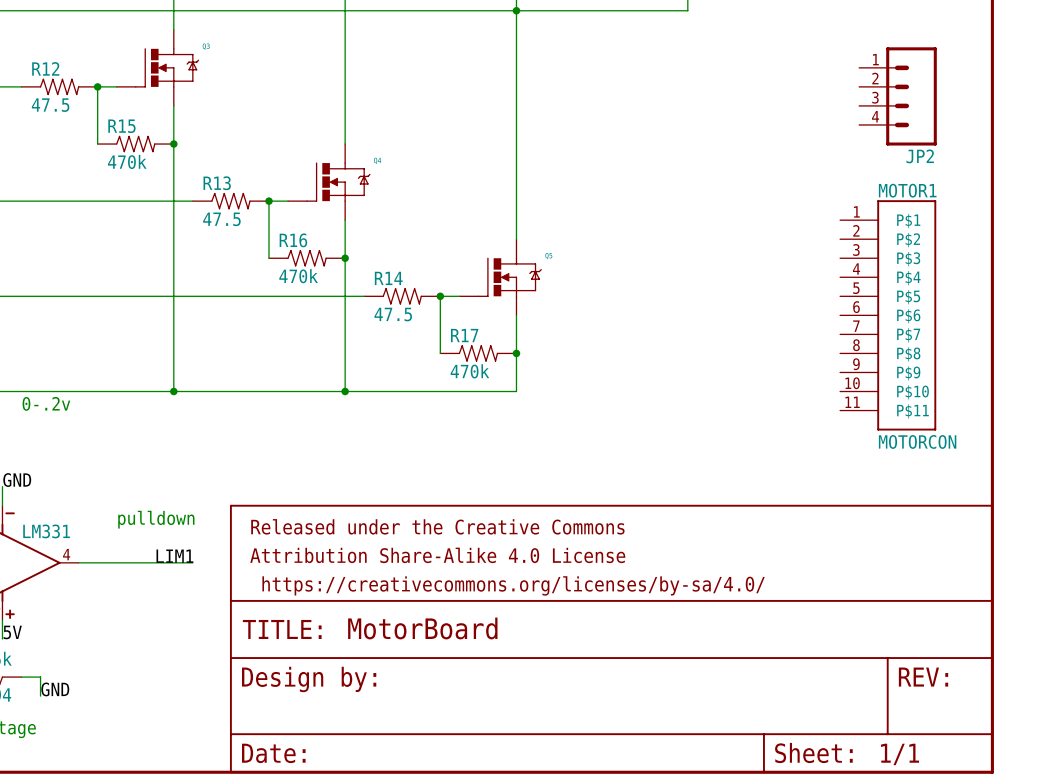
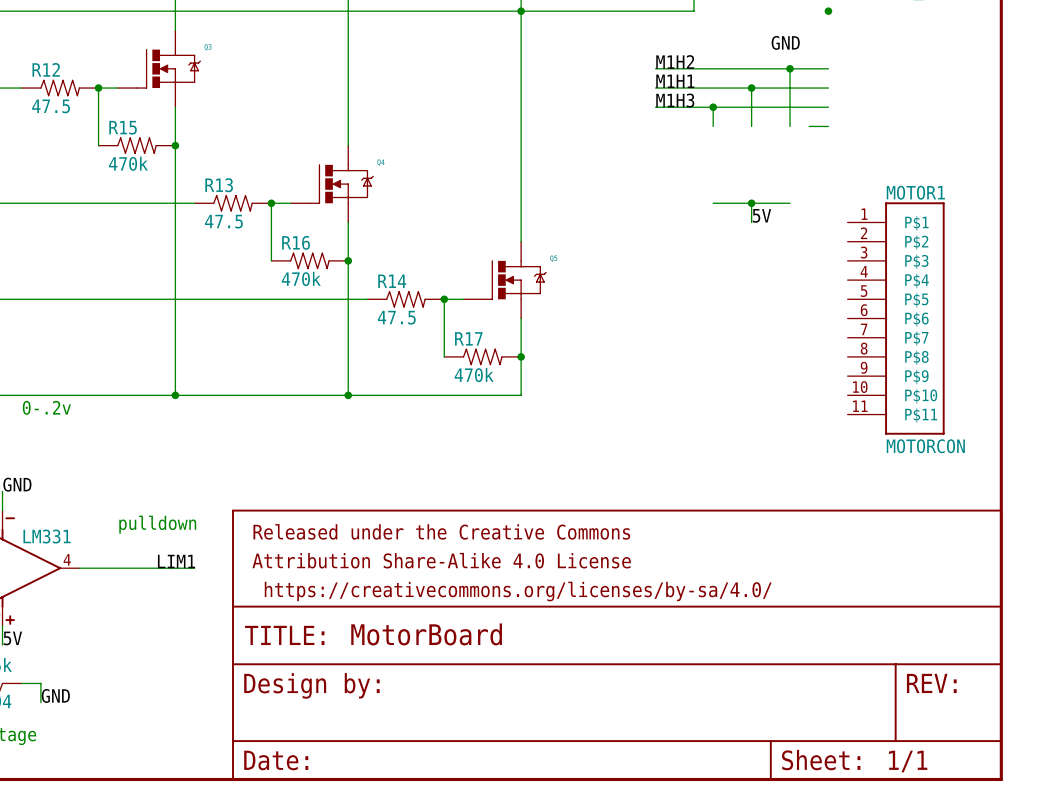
junction: none -> (828, 11)
label: none -> GND (785, 42)
label: none -> M1H2 (675, 61)
wire: none -> (655, 68) (828, 68)
wire: none -> (790, 68) (790, 126)
junction: none -> (790, 68)
label: none -> M1H1 (675, 81)
wire: none -> (655, 88) (828, 88)
wire: none -> (751, 88) (751, 126)
junction: none -> (751, 88)
JP2: (897, 96) -> none
label: none -> M1H3 (675, 100)
wire: none -> (655, 107) (828, 107)
wire: none -> (713, 107) (713, 126)
junction: none -> (713, 107)
wire: none -> (809, 126) (828, 126)
wire: none -> (713, 203) (790, 203)
wire: none -> (751, 203) (751, 222)
junction: none -> (751, 203)
label: none -> 5V (761, 215)

